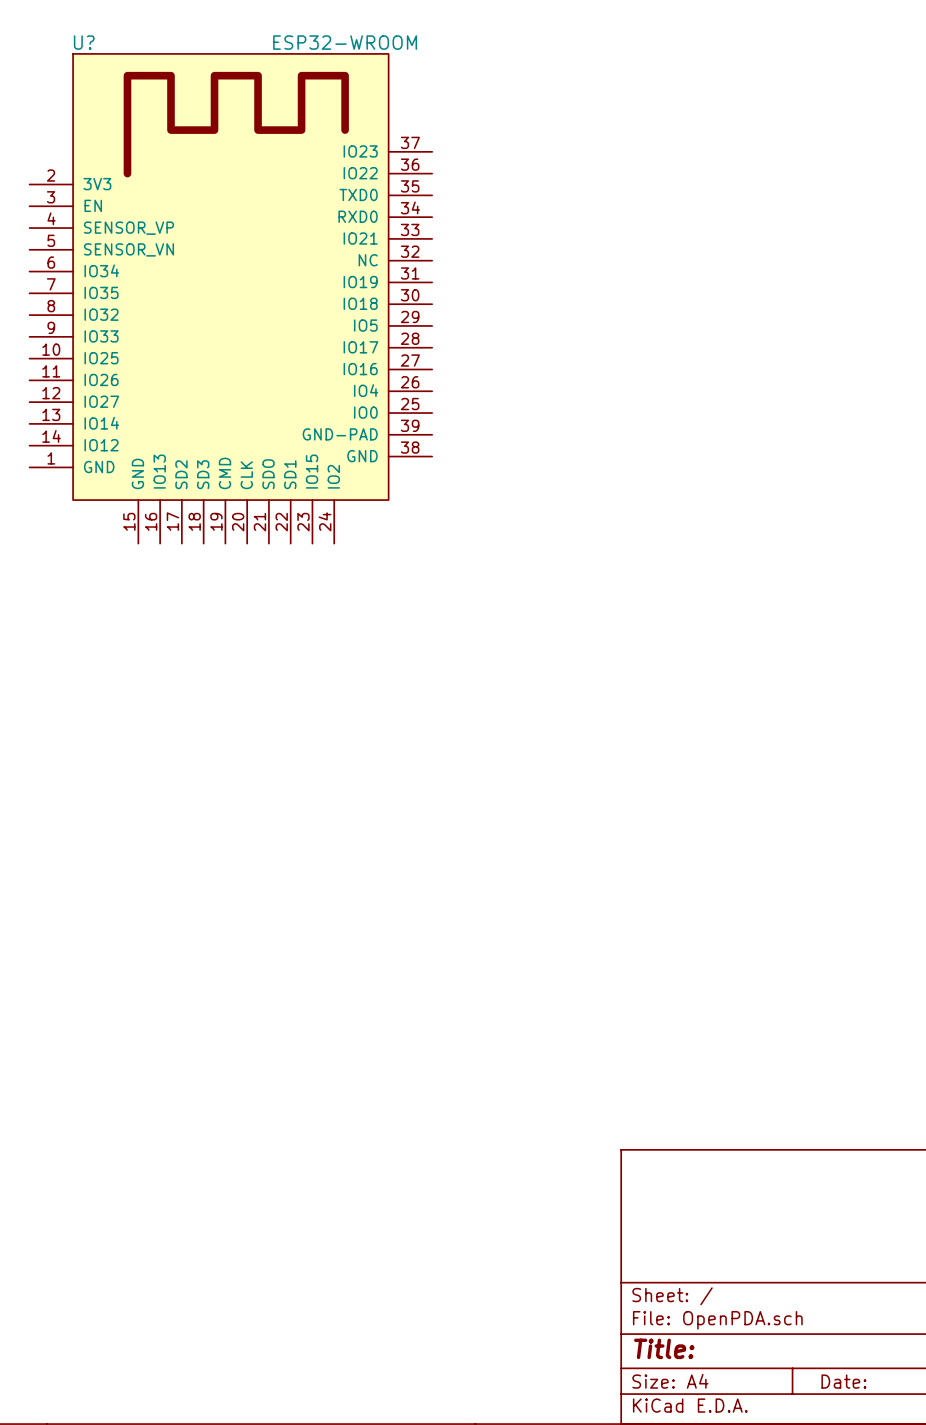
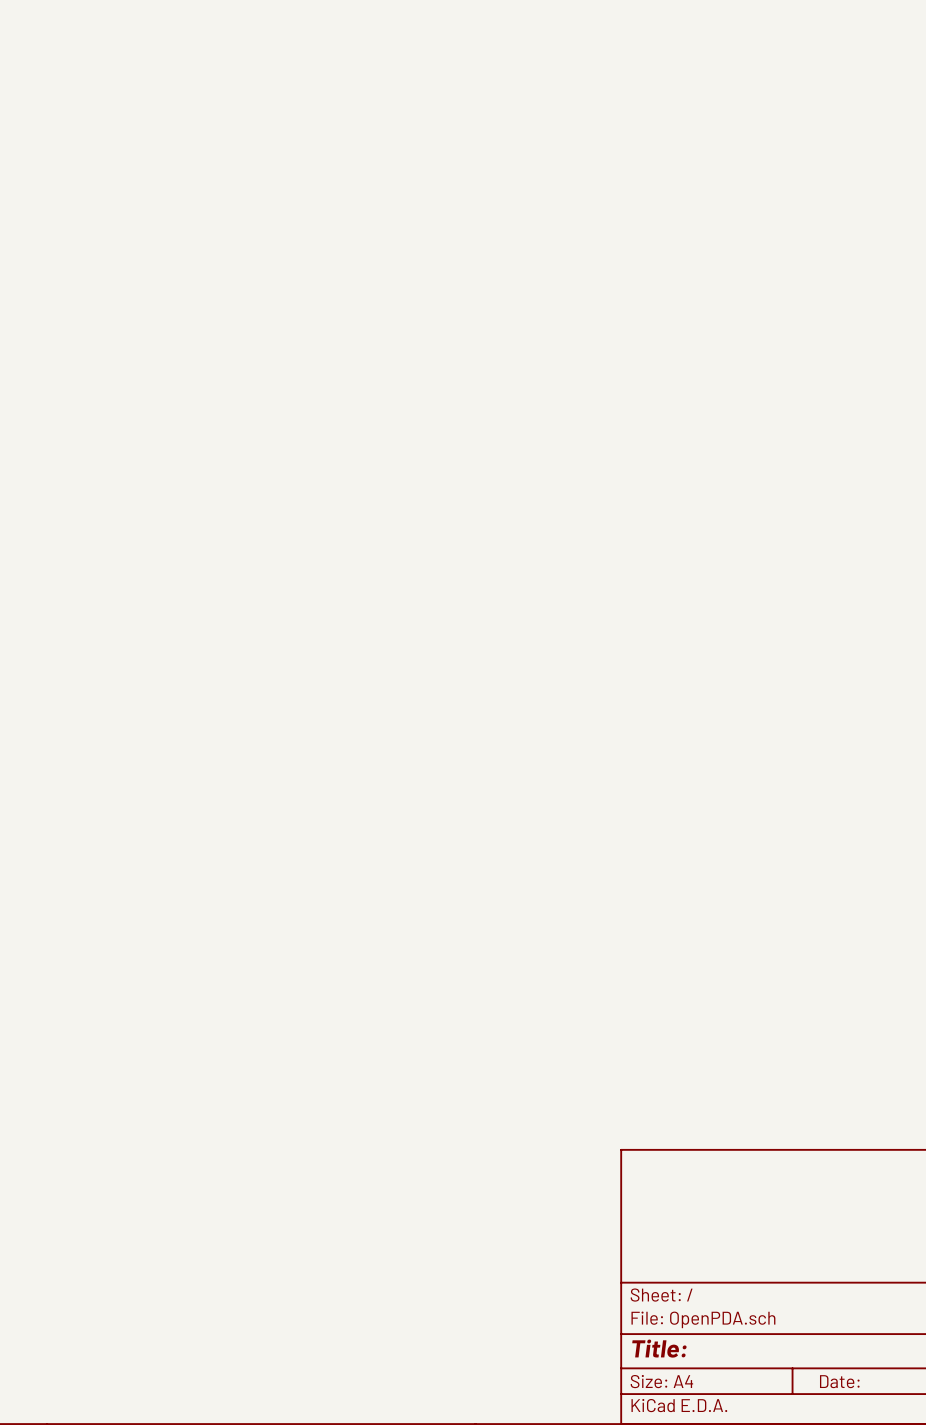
U?: ESP32-WROOM (230, 298) -> none

